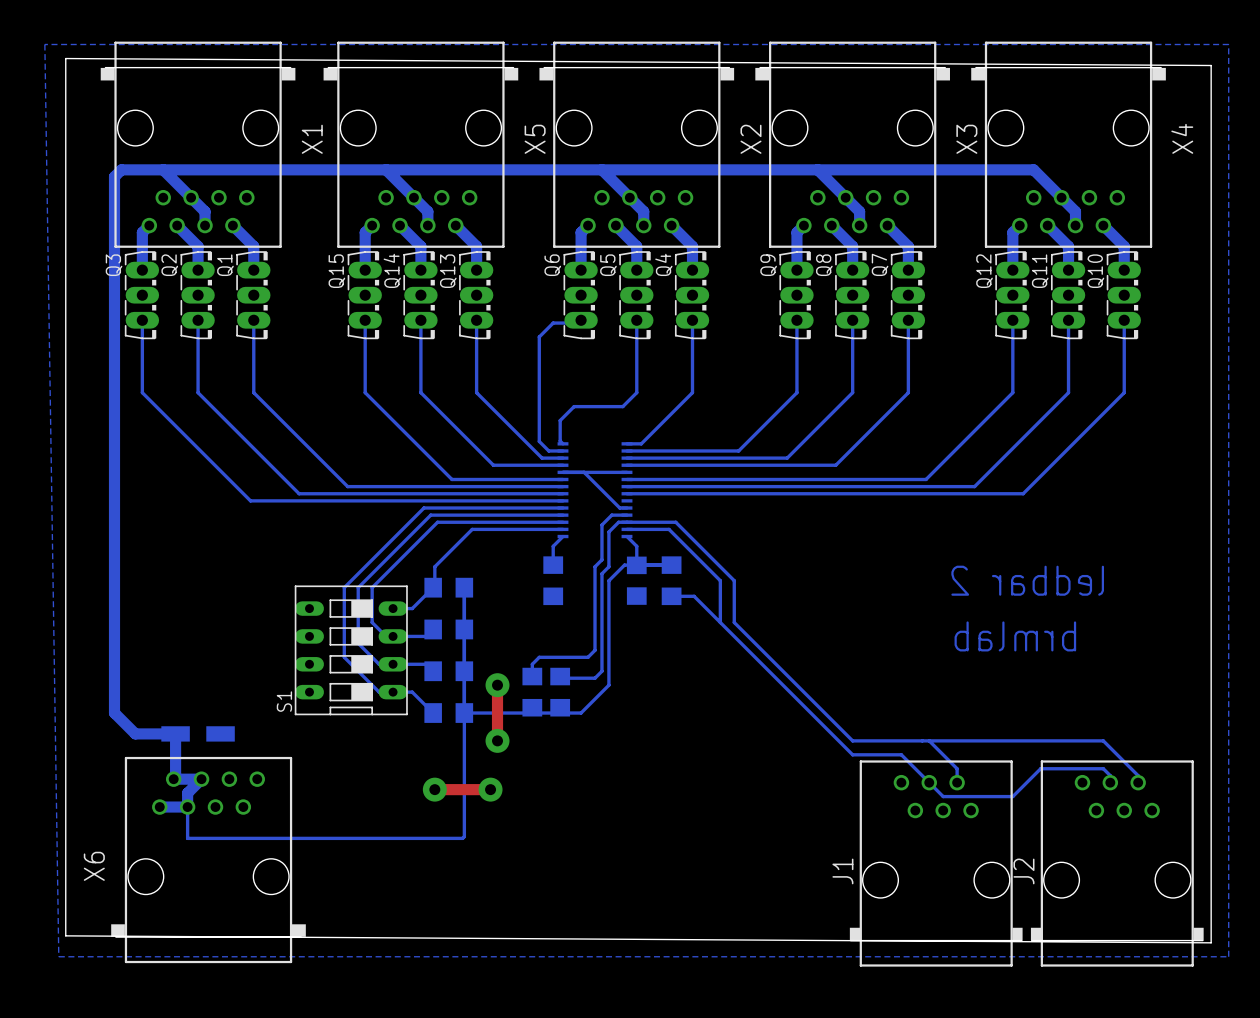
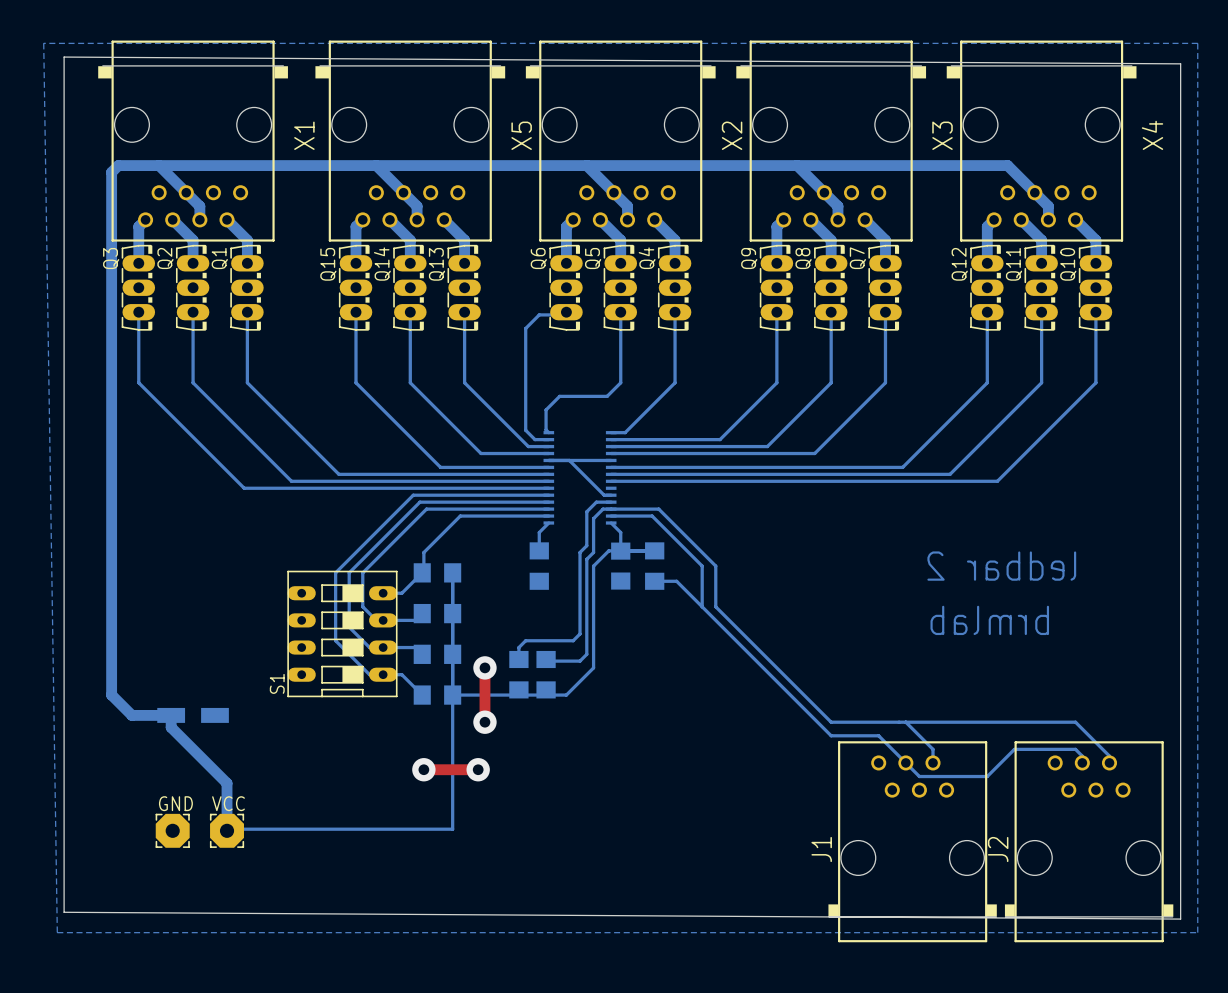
bottom track: (175, 746) (175, 777) (173, 779) (201, 779) (187, 793) (187, 807) -> none
bottom track: (159, 807) (187, 807) -> none
bottom track: (187, 807) (187, 838) (462, 838) (464, 836) -> (171, 727) (227, 783) (227, 830) (227, 829) (452, 829) (452, 815)
GND: none -> (172, 830)
VCC: none -> (227, 830)
X6: (208, 860) -> none

